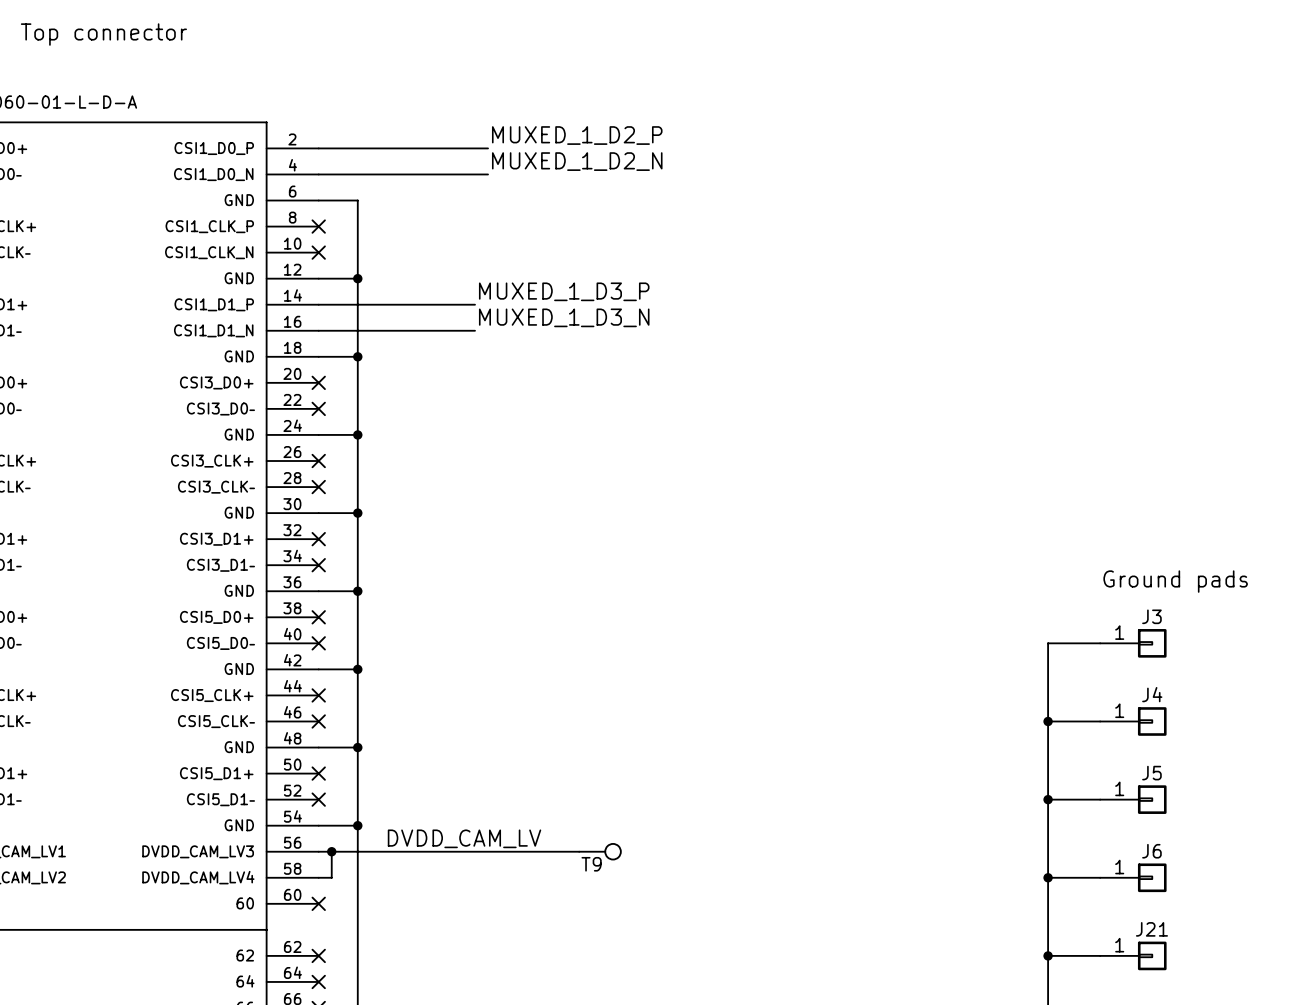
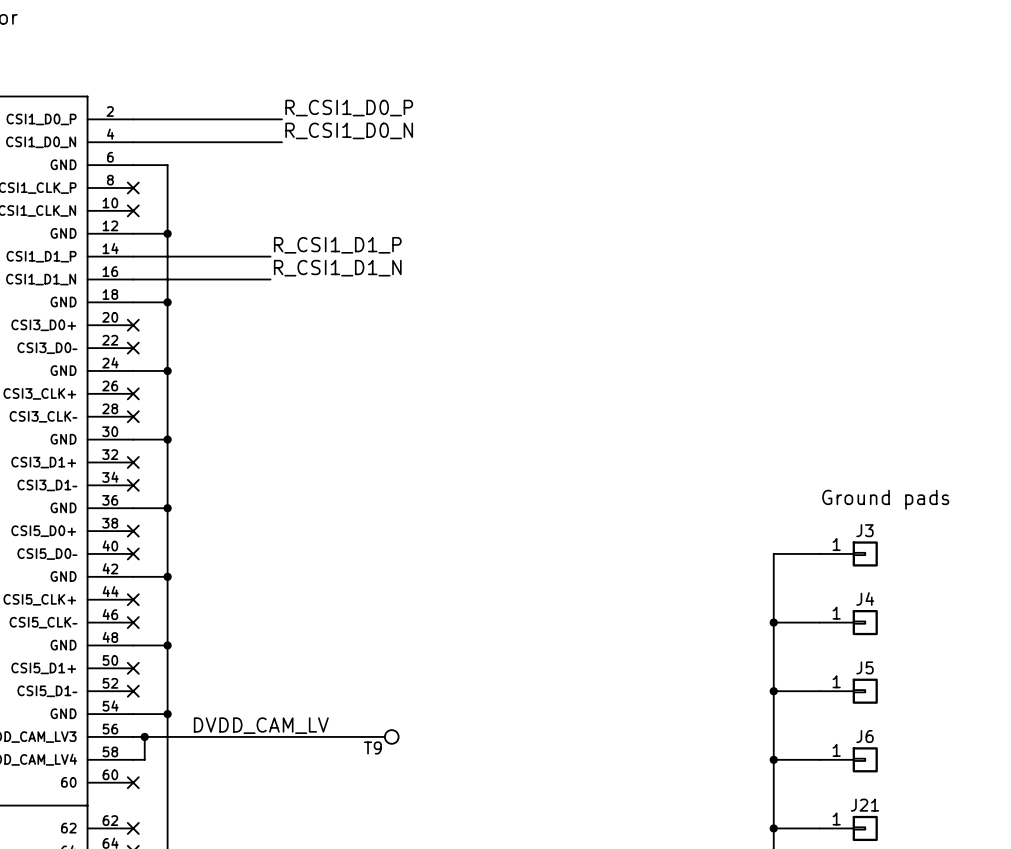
label: MUXED_1_D2_P (577, 135) -> R_CSI1_D0_P (349, 108)
label: MUXED_1_D2_N (577, 161) -> R_CSI1_D0_N (349, 130)
label: MUXED_1_D3_P (564, 291) -> R_CSI1_D1_P (337, 245)
label: MUXED_1_D3_N (564, 317) -> R_CSI1_D1_N (337, 268)

